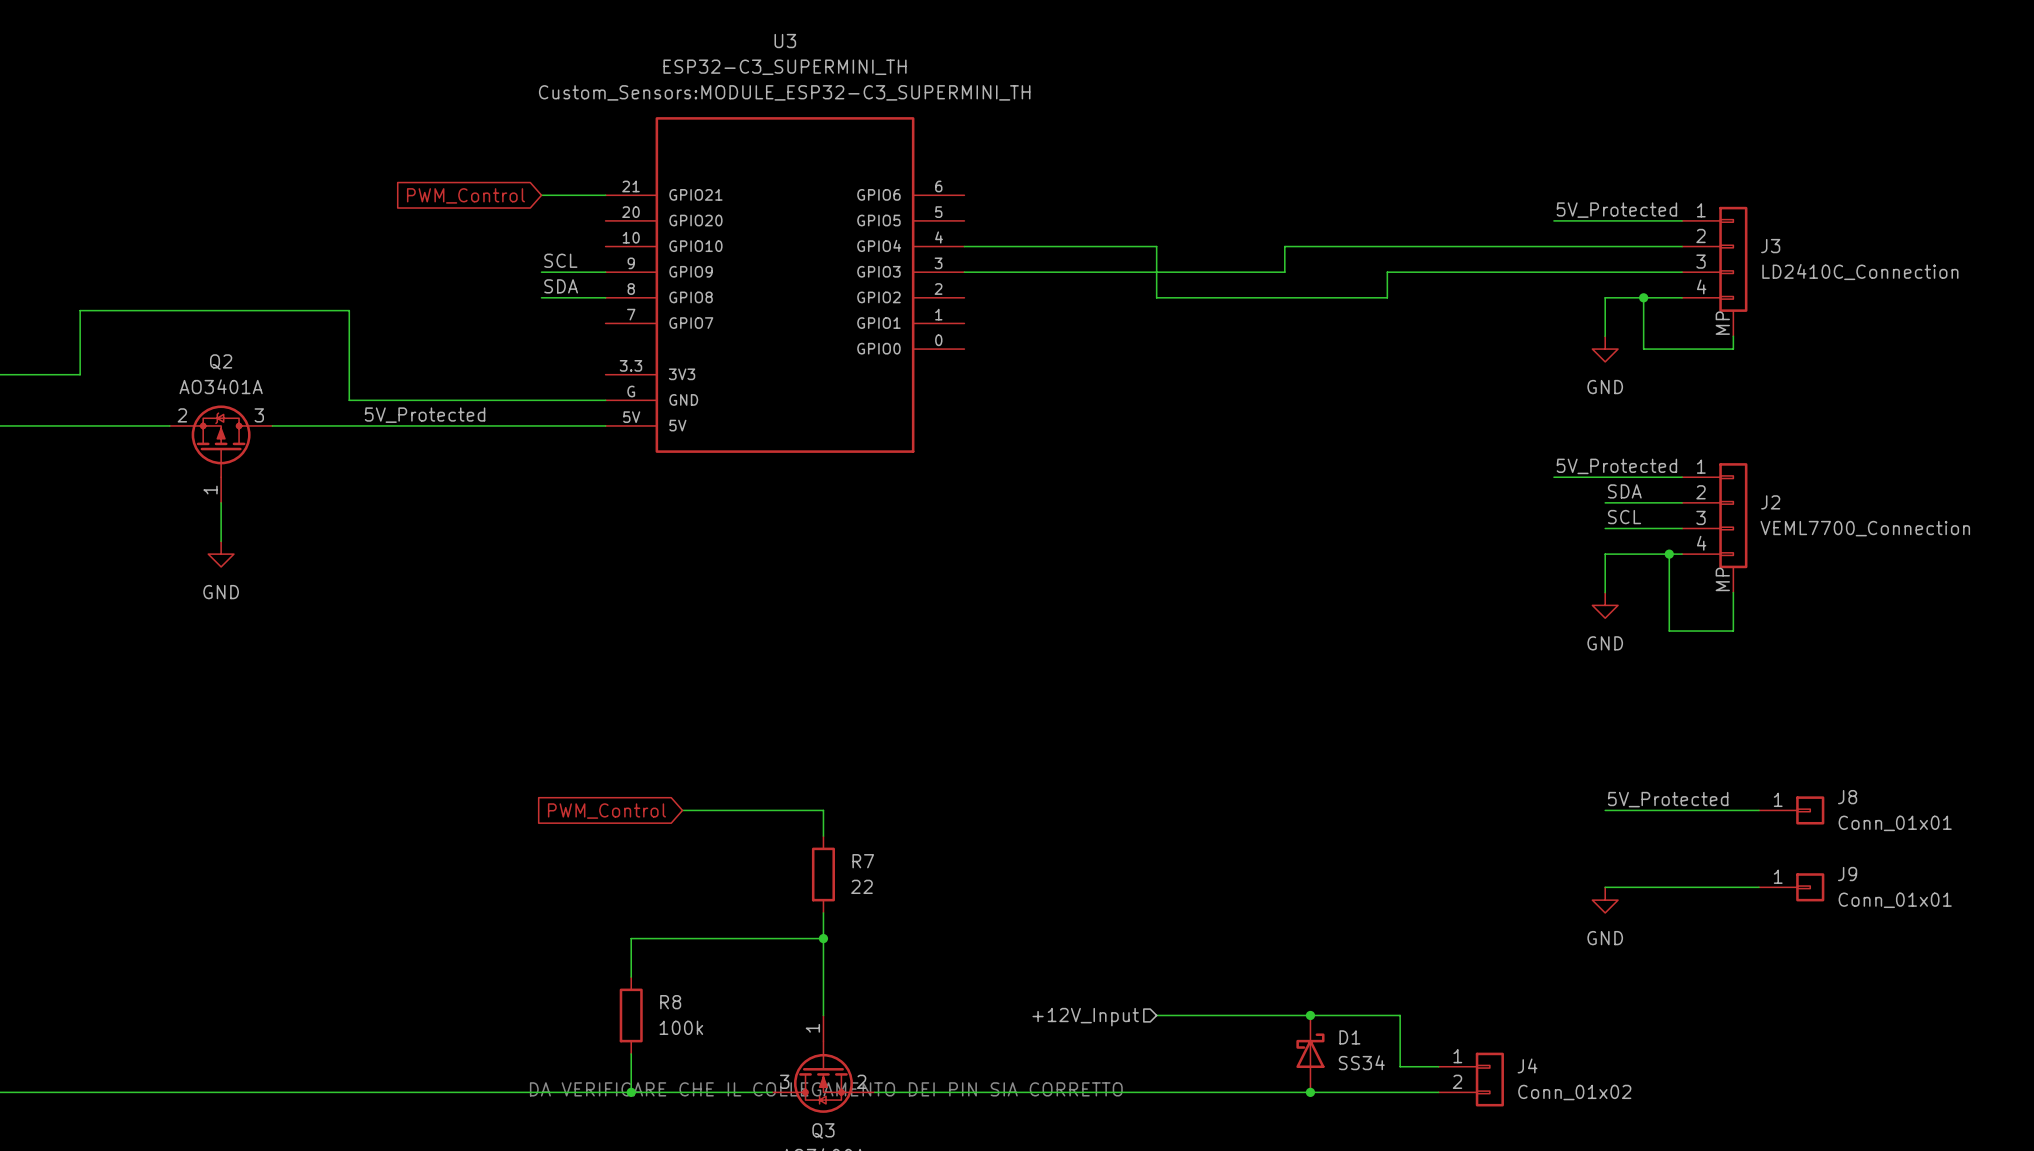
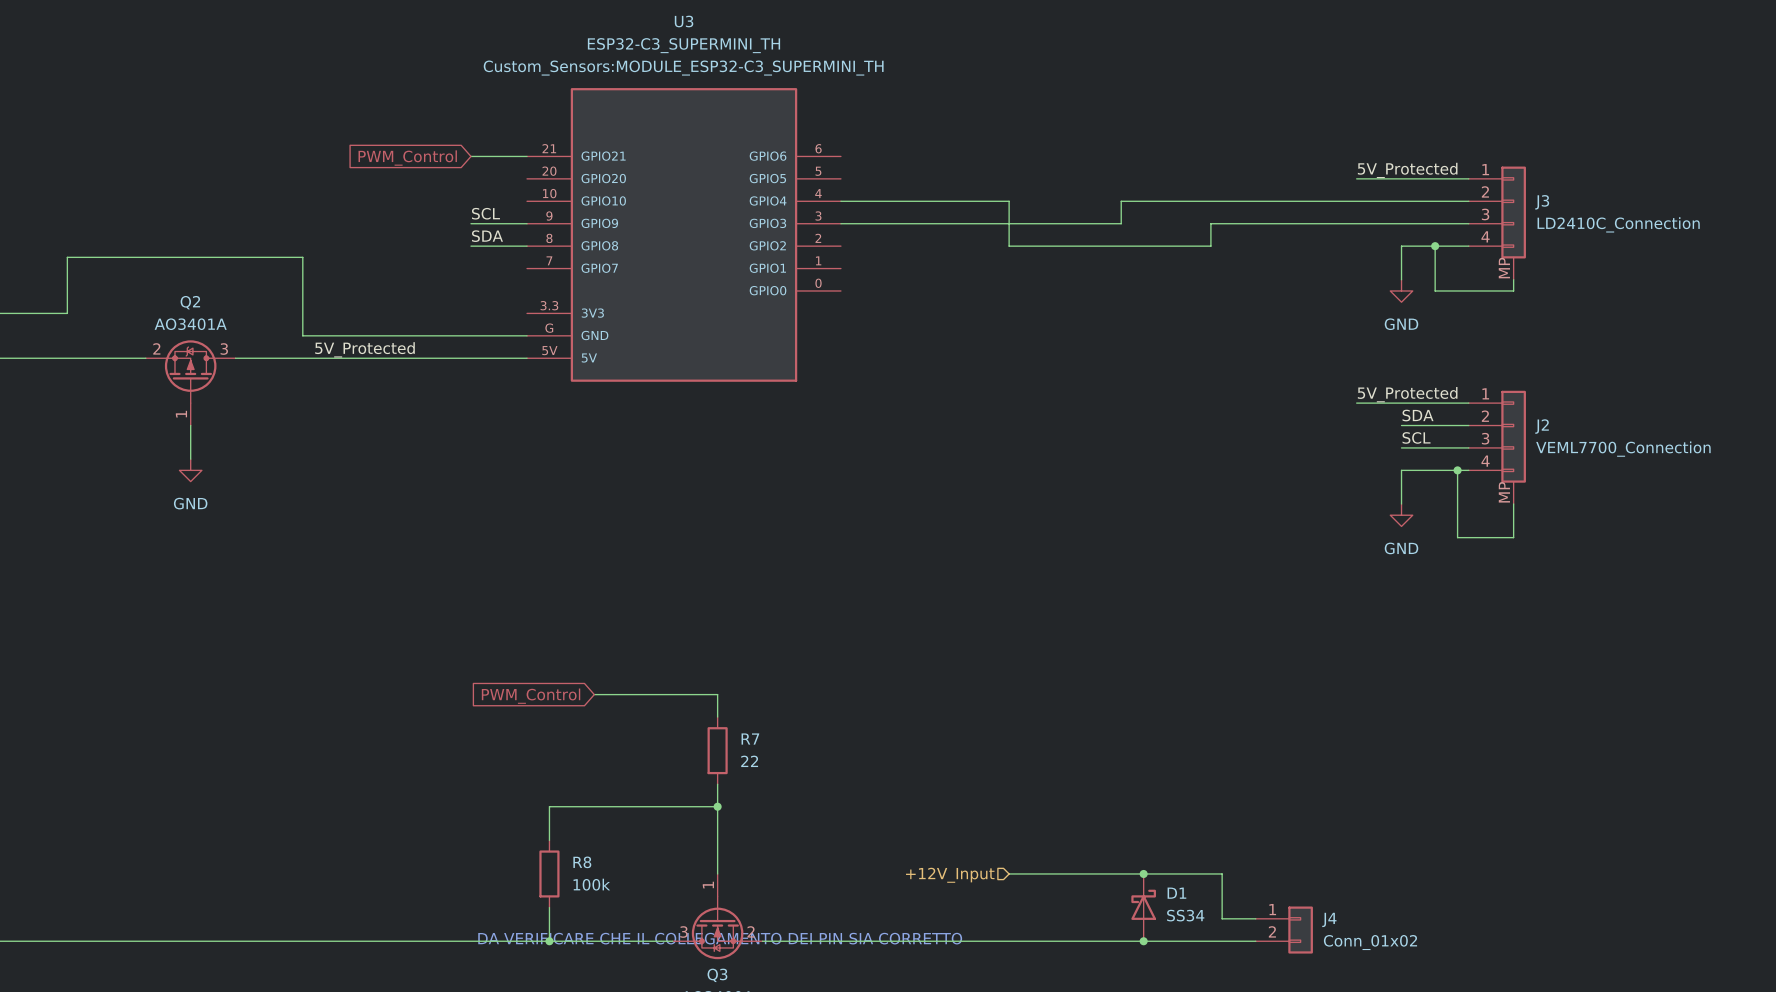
label: 5V_Protected (1668, 799) -> none
wire: (1605, 810) (1758, 810) -> none
J8: Conn_01x01 (1791, 810) -> none
wire: (1605, 887) (1758, 887) -> none
J9: Conn_01x01 (1791, 887) -> none
power symbol: GND (1605, 900) -> none

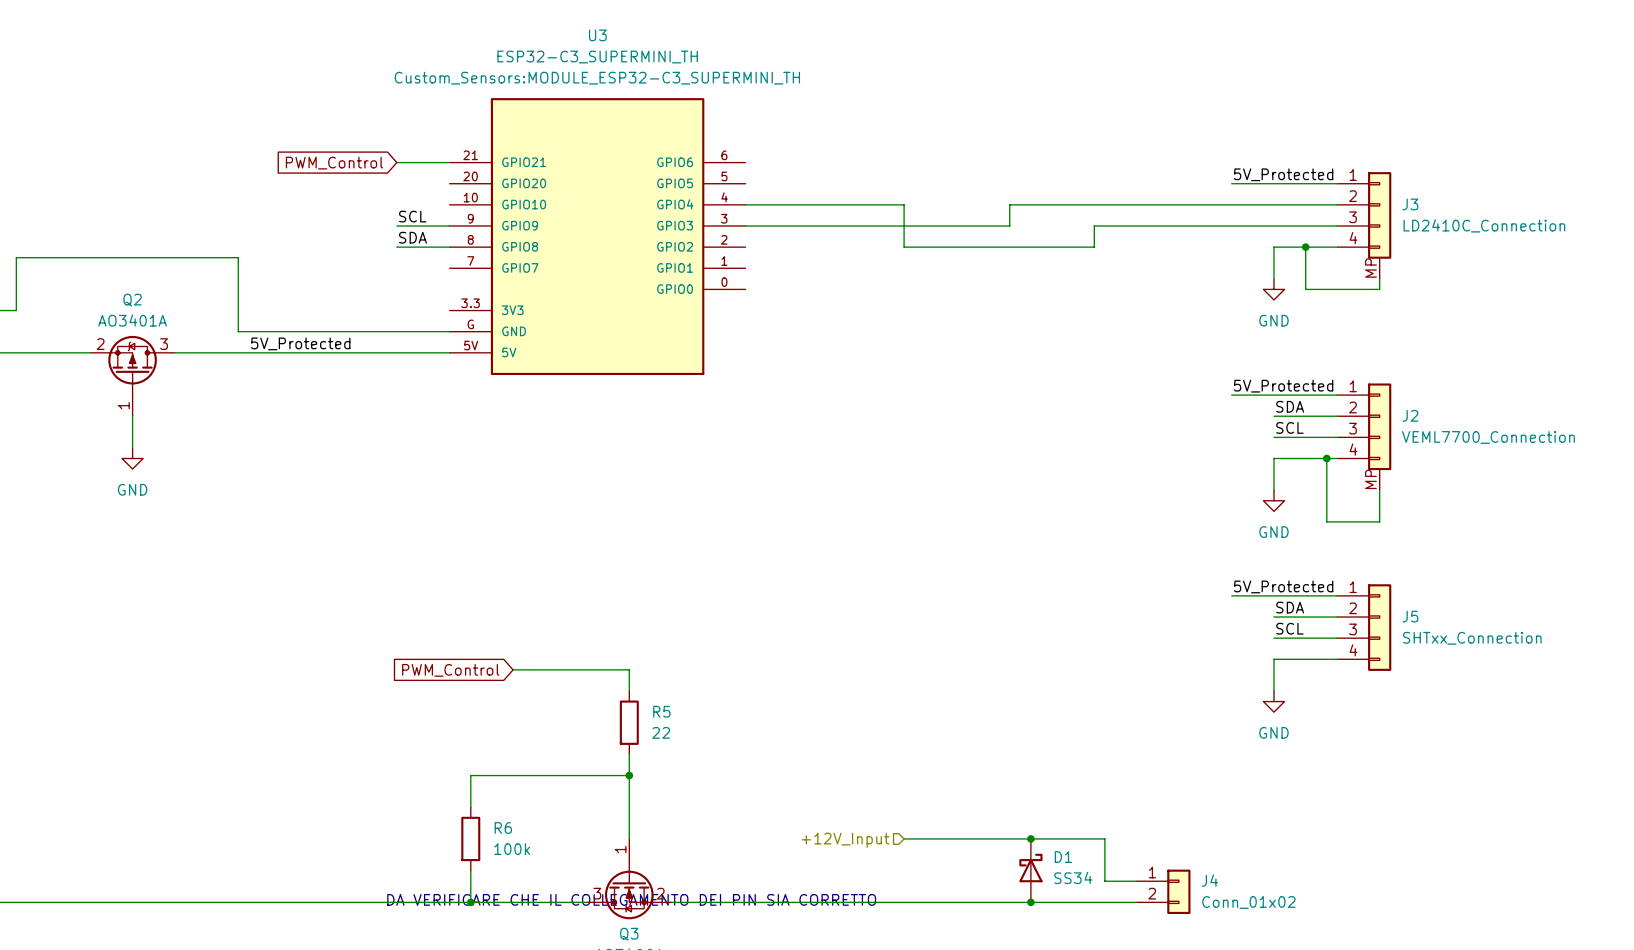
label: none -> 5V_Protected (1283, 586)
wire: none -> (1231, 595) (1337, 595)
label: none -> SDA (1290, 607)
wire: none -> (1273, 617) (1337, 617)
J5: none -> SHTxx_Connection (1364, 627)
label: none -> SCL (1289, 628)
wire: none -> (1273, 638) (1337, 638)
wire: none -> (1337, 659) (1273, 659) (1273, 691)
power symbol: none -> GND (1273, 701)
R7 name: R7 (750, 739) -> R5 (661, 711)
R8 name: R8 (582, 862) -> R6 (503, 827)

